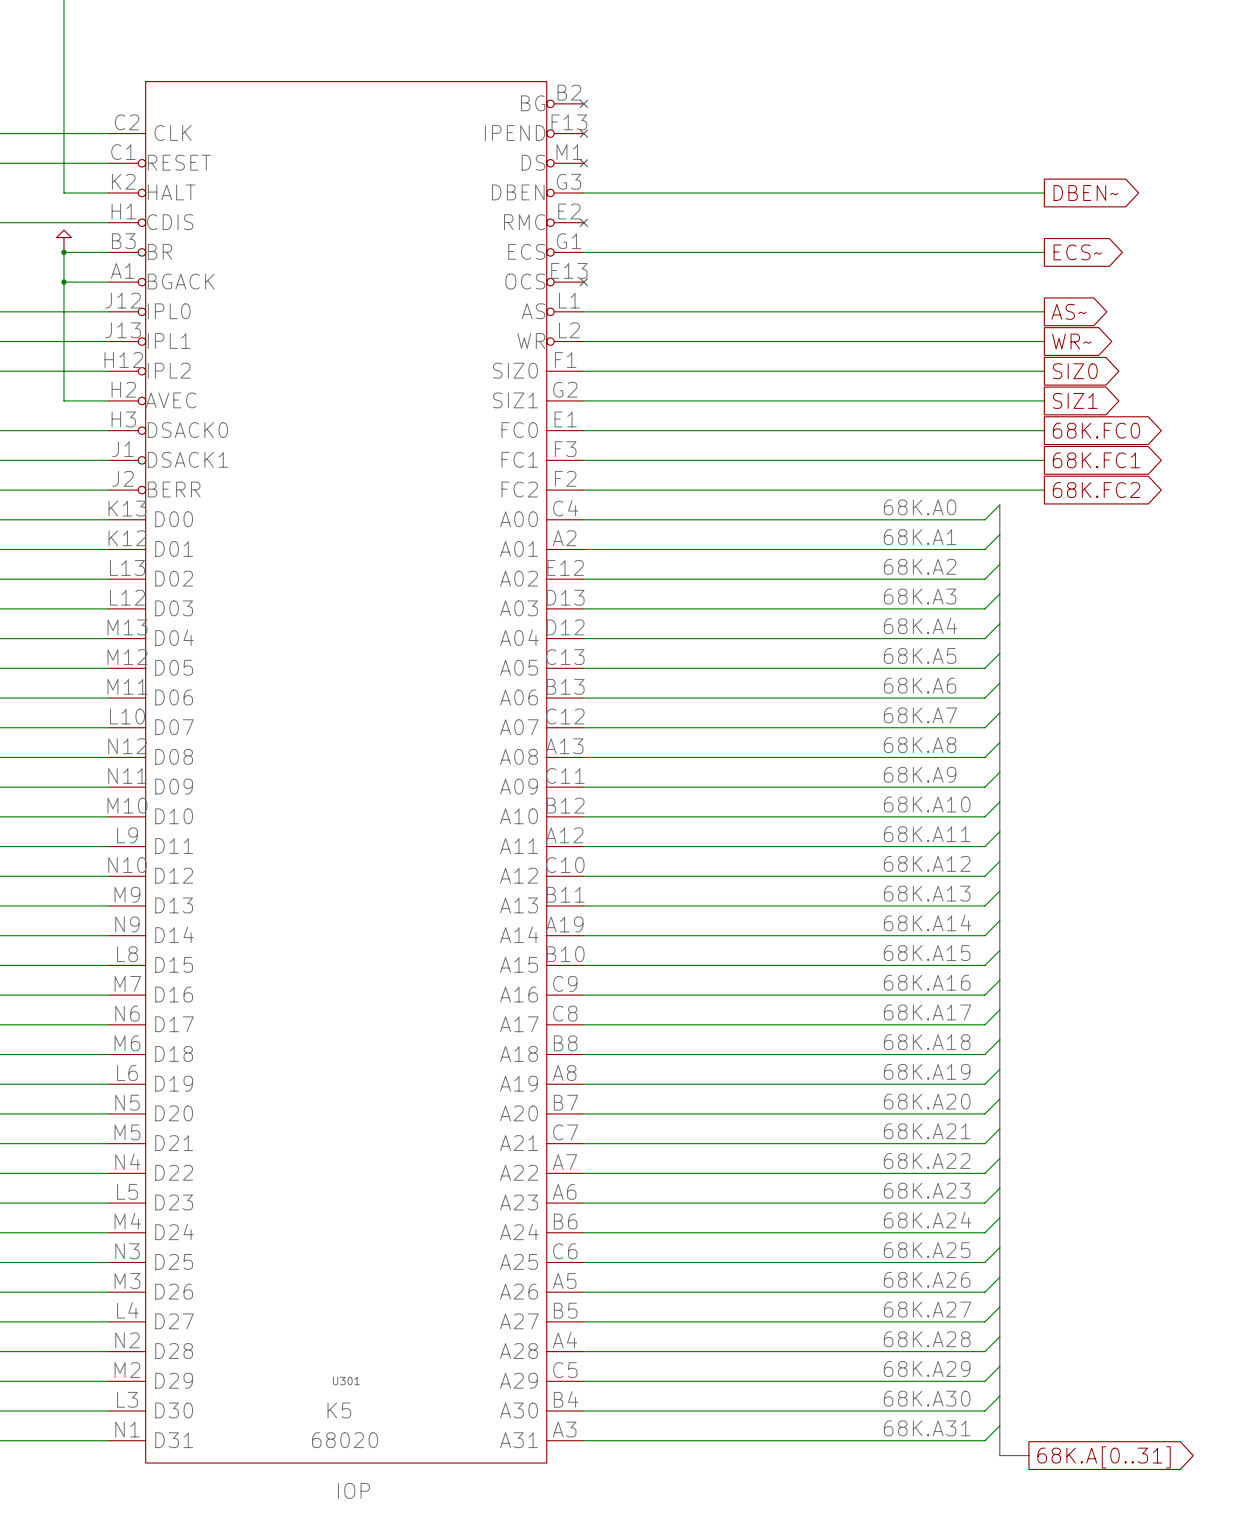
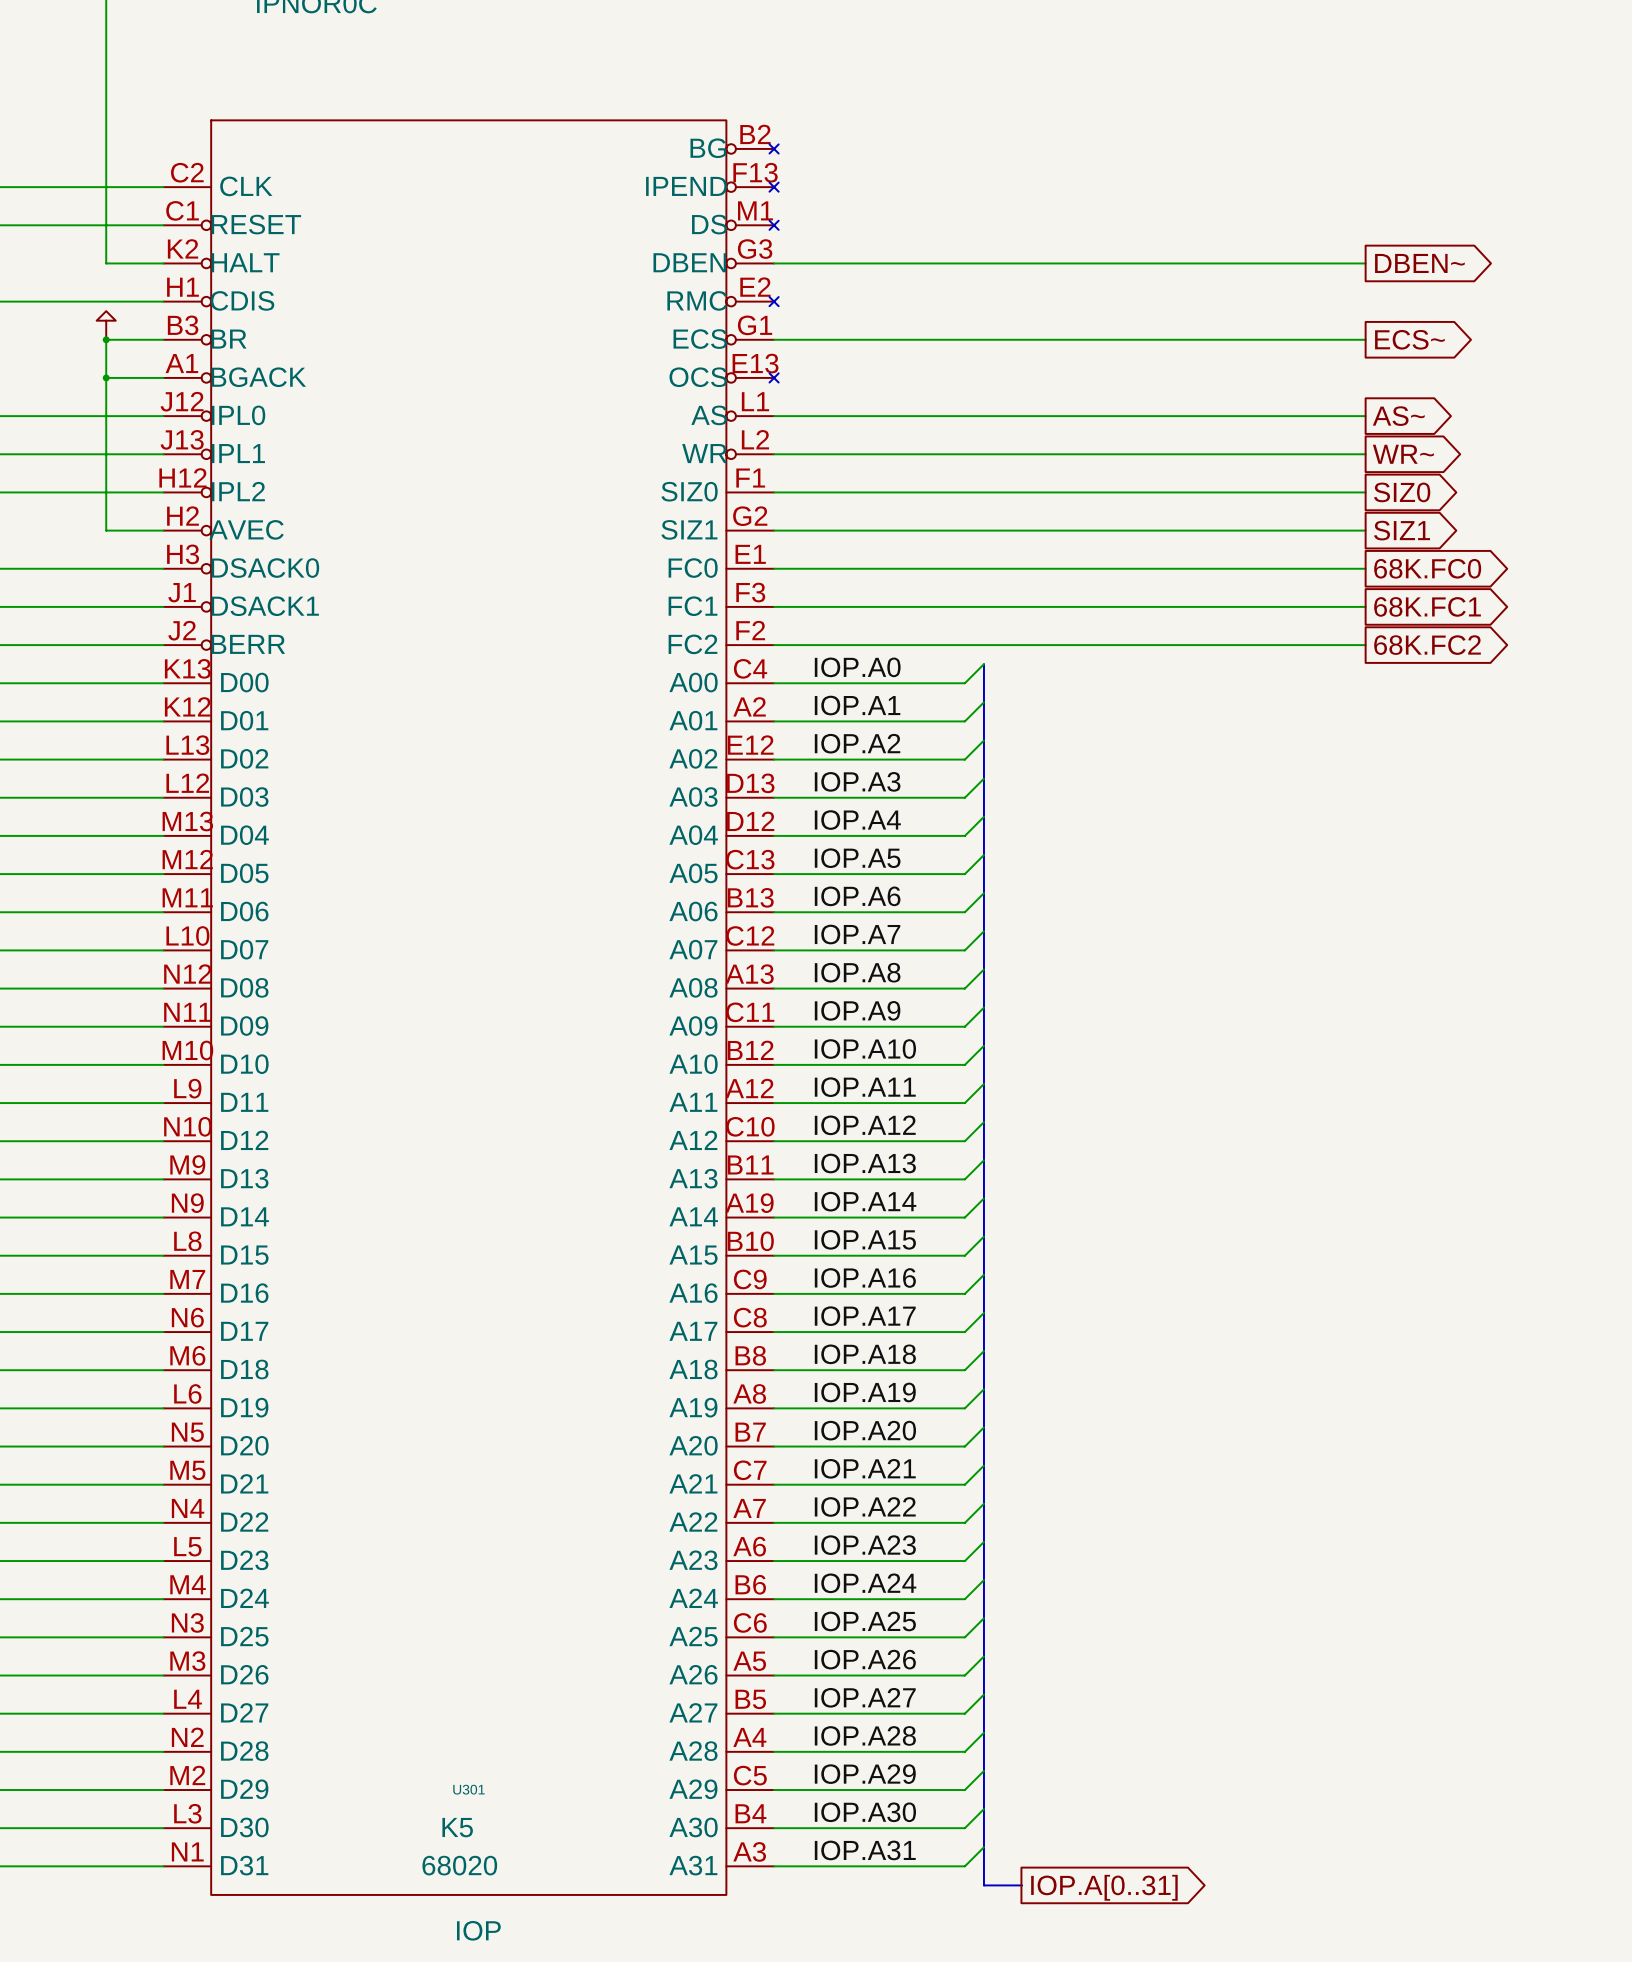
bus: none -> (983, 664) (983, 1885) (1022, 1885)
bus: (999, 504) (999, 1455) (1029, 1455) -> none
wire: (999, 504) (984, 519) (732, 519) -> (983, 664) (964, 683)
label: none -> IOP.A0 (857, 667)
label: 68K.A0 (920, 507) -> none
wire: (999, 534) (984, 549) (732, 549) -> (983, 702) (964, 721)
label: none -> IOP.A1 (857, 705)
label: 68K.A1 (920, 537) -> none
wire: (999, 564) (984, 579) (732, 579) -> (983, 740) (964, 759)
label: none -> IOP.A2 (857, 743)
label: 68K.A2 (920, 566) -> none
wire: (999, 594) (984, 608) (732, 608) -> (983, 778) (964, 797)
label: none -> IOP.A3 (857, 781)
label: 68K.A3 (920, 596) -> none
wire: (999, 623) (984, 638) (732, 638) -> (983, 816) (964, 835)
label: none -> IOP.A4 (857, 820)
label: 68K.A4 (920, 625) -> none
wire: (999, 653) (984, 668) (732, 668) -> (983, 854) (964, 874)
label: none -> IOP.A5 (857, 858)
label: 68K.A5 (920, 655) -> none
wire: (999, 683) (984, 698) (732, 698) -> (983, 893) (964, 912)
label: none -> IOP.A6 (857, 896)
label: 68K.A6 (920, 685) -> none
wire: (999, 712) (984, 727) (732, 727) -> (983, 931) (964, 950)
label: none -> IOP.A7 (857, 934)
label: 68K.A7 (920, 715) -> none
wire: (999, 742) (984, 757) (732, 757) -> (983, 969) (964, 988)
label: none -> IOP.A8 (857, 972)
label: 68K.A8 (920, 745) -> none
wire: (999, 772) (984, 787) (732, 787) -> (983, 1007) (964, 1026)
label: none -> IOP.A9 (857, 1010)
label: 68K.A9 (920, 774) -> none
wire: (999, 802) (984, 816) (732, 816) -> (983, 1045) (964, 1064)
label: none -> IOP.A10 (865, 1049)
label: 68K.A10 (927, 804) -> none
wire: (999, 831) (984, 846) (732, 846) -> (983, 1083) (964, 1103)
label: none -> IOP.A11 (865, 1087)
label: 68K.A11 (927, 834) -> none
wire: (999, 861) (984, 876) (732, 876) -> (983, 1122) (964, 1141)
label: none -> IOP.A12 (865, 1125)
label: 68K.A12 (927, 863) -> none
wire: (999, 891) (984, 905) (732, 905) -> (983, 1160) (964, 1179)
label: none -> IOP.A13 (865, 1163)
label: 68K.A13 (927, 893) -> none
wire: (999, 920) (984, 935) (732, 935) -> (983, 1198) (964, 1217)
label: none -> IOP.A14 (865, 1201)
label: 68K.A14 (927, 922) -> none
wire: (999, 950) (984, 965) (732, 965) -> (983, 1236) (964, 1255)
label: none -> IOP.A15 (865, 1239)
label: 68K.A15 (927, 953) -> none
wire: (999, 980) (984, 995) (732, 995) -> (983, 1274) (964, 1293)
label: none -> IOP.A16 (865, 1277)
label: 68K.A16 (927, 982) -> none
wire: (999, 1009) (984, 1024) (732, 1024) -> (983, 1312) (964, 1332)
label: none -> IOP.A17 (865, 1316)
label: 68K.A17 (927, 1012) -> none
wire: (999, 1039) (984, 1054) (732, 1054) -> (983, 1351) (964, 1370)
label: none -> IOP.A18 (865, 1354)
label: 68K.A18 (927, 1042) -> none
wire: (999, 1069) (984, 1084) (732, 1084) -> (983, 1389) (964, 1408)
label: none -> IOP.A19 (865, 1392)
label: 68K.A19 (927, 1071) -> none
wire: (999, 1099) (984, 1113) (732, 1113) -> (983, 1427) (964, 1446)
label: none -> IOP.A20 (865, 1430)
label: 68K.A20 (927, 1101) -> none
wire: (999, 1128) (984, 1143) (732, 1143) -> (983, 1465) (964, 1484)
label: none -> IOP.A21 (865, 1468)
label: 68K.A21 (927, 1131) -> none
wire: (999, 1158) (984, 1173) (732, 1173) -> (983, 1503) (964, 1522)
label: none -> IOP.A22 (865, 1506)
label: 68K.A22 (927, 1160) -> none
wire: (999, 1188) (984, 1203) (732, 1203) -> (983, 1541) (964, 1561)
label: none -> IOP.A23 (865, 1545)
label: 68K.A23 (927, 1190) -> none
wire: (999, 1217) (984, 1232) (732, 1232) -> (983, 1580) (964, 1599)
label: none -> IOP.A24 (865, 1583)
label: 68K.A24 (927, 1220) -> none
wire: (999, 1247) (984, 1262) (732, 1262) -> (983, 1618) (964, 1637)
label: none -> IOP.A25 (865, 1621)
label: 68K.A25 (927, 1250) -> none
wire: (999, 1277) (984, 1292) (732, 1292) -> (983, 1656) (964, 1675)
label: none -> IOP.A26 (865, 1659)
label: 68K.A26 (927, 1279) -> none
wire: (999, 1307) (984, 1321) (732, 1321) -> (983, 1694) (964, 1713)
label: none -> IOP.A27 (865, 1697)
label: 68K.A27 (927, 1309) -> none
wire: (999, 1336) (984, 1351) (732, 1351) -> (983, 1732) (964, 1751)
label: none -> IOP.A28 (865, 1735)
label: 68K.A28 (927, 1339) -> none
wire: (999, 1366) (984, 1381) (732, 1381) -> (983, 1770) (964, 1790)
label: none -> IOP.A29 (865, 1774)
label: 68K.A29 (927, 1368) -> none
wire: (999, 1396) (984, 1411) (732, 1411) -> (983, 1809) (964, 1828)
label: none -> IOP.A30 (865, 1812)
label: 68K.A30 (927, 1398) -> none
wire: (999, 1425) (984, 1440) (732, 1440) -> (983, 1847) (964, 1866)
label: none -> IOP.A31 (865, 1850)
label: 68K.A31 (927, 1428) -> none
global label: none -> IOP.A[0..31] (1104, 1887)
global label: 68K.A[0..31] (1104, 1457) -> none

